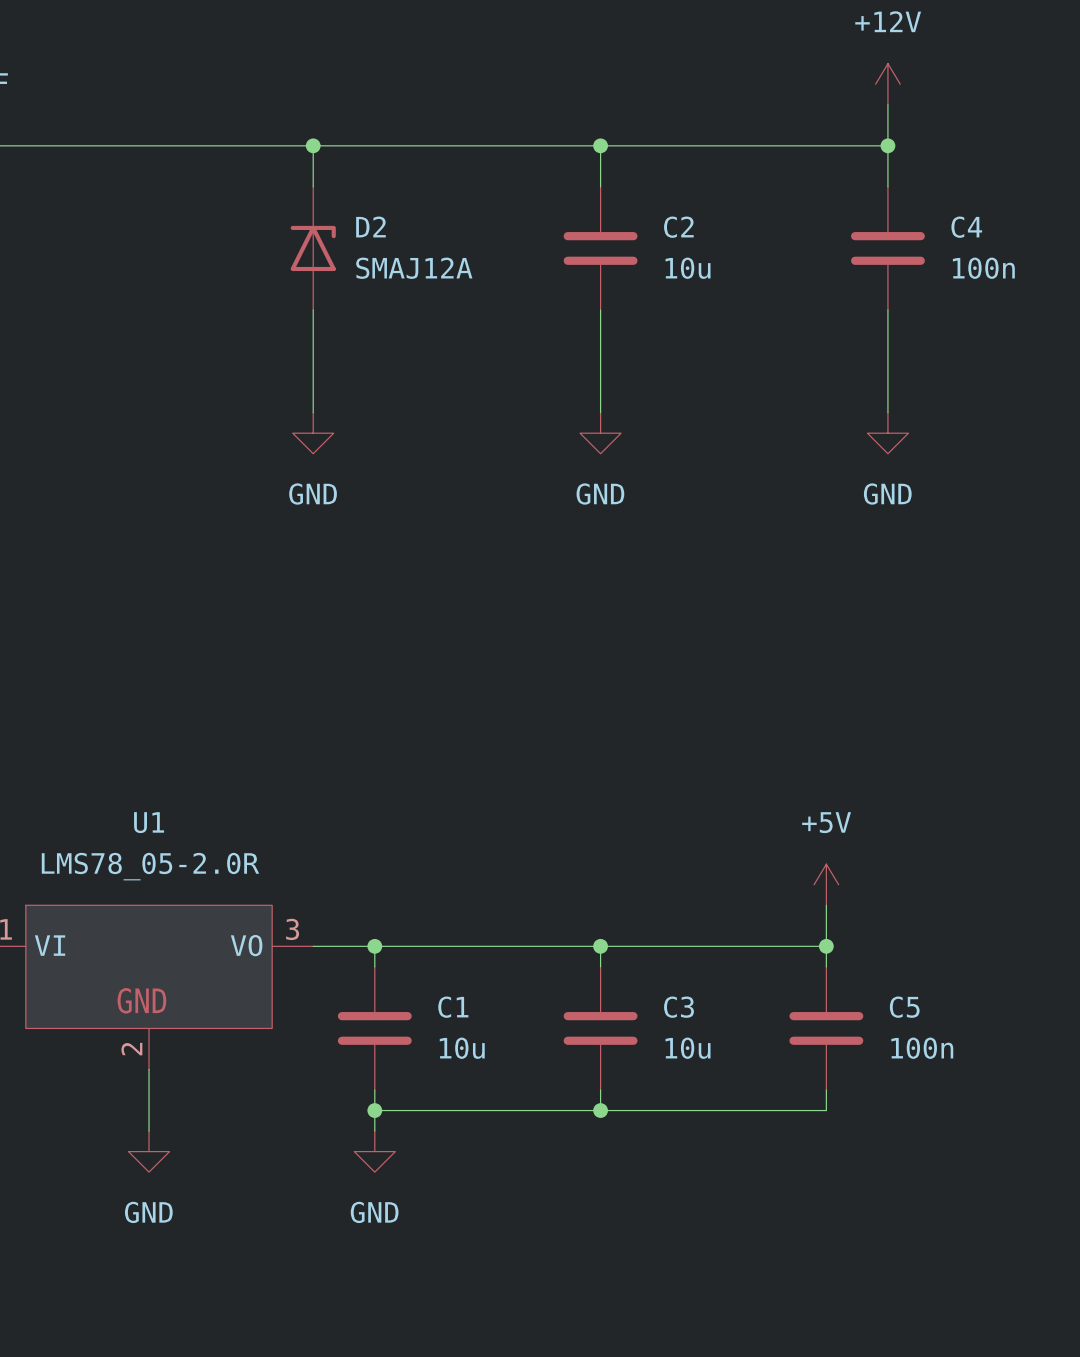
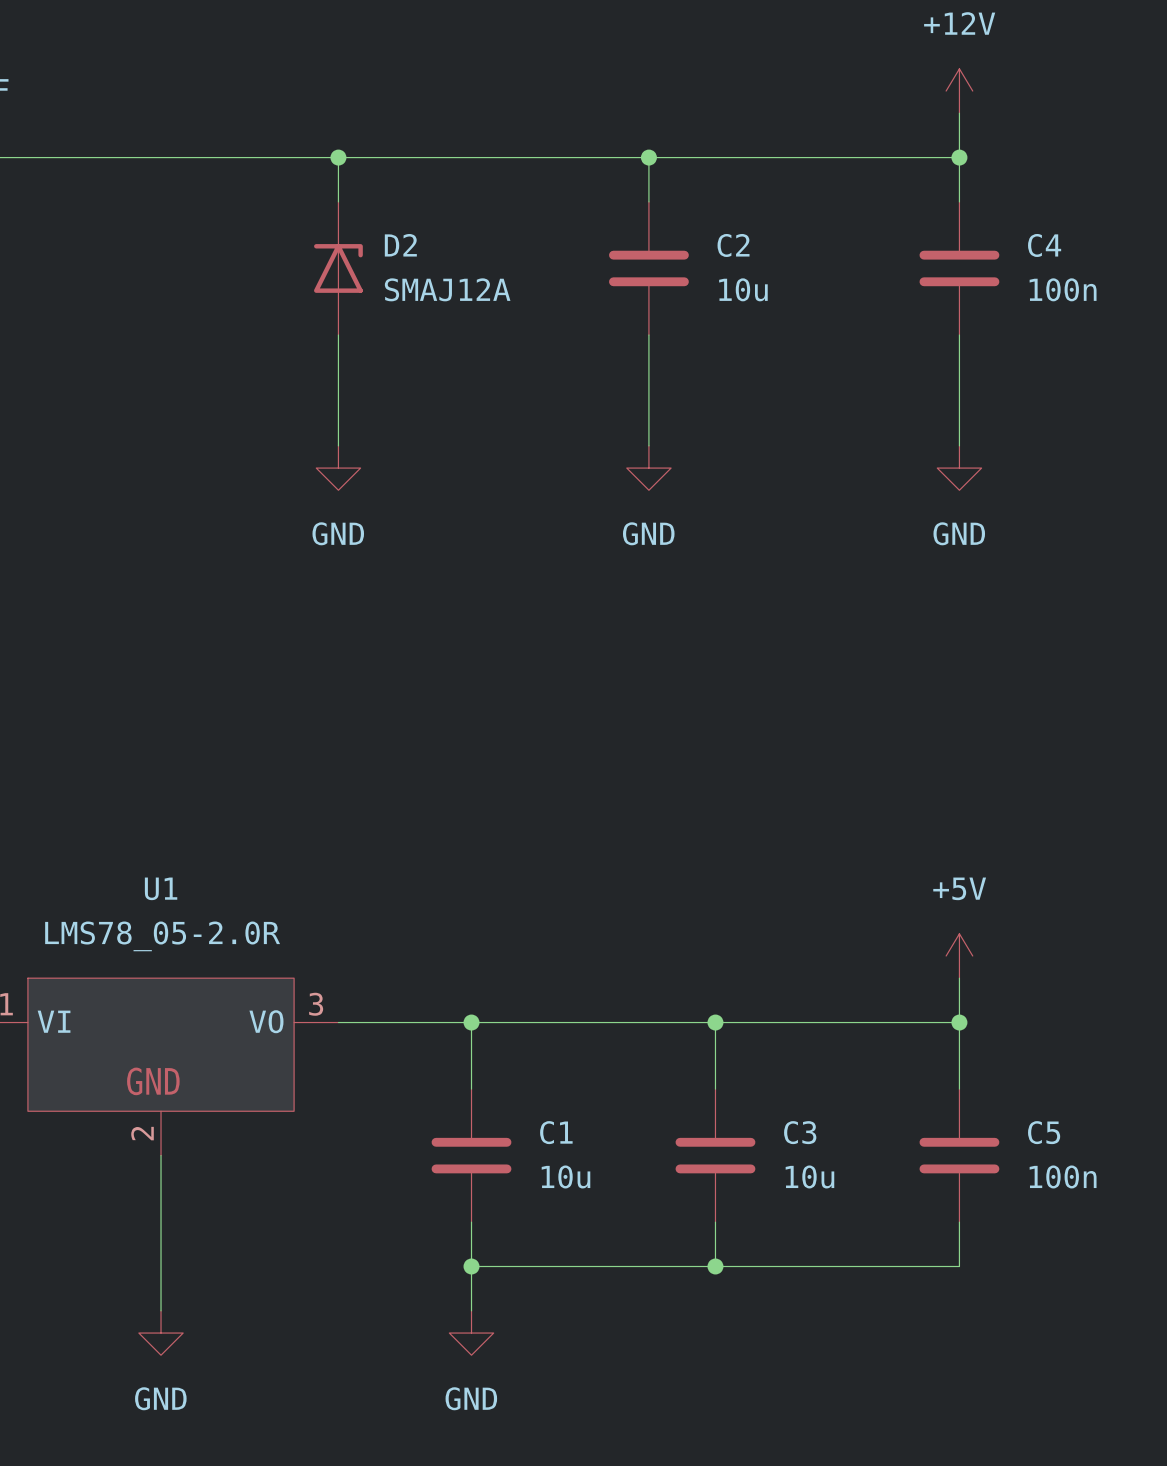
power symbol position: +5V (826, 884) -> +5V (959, 956)
wire: (826, 905) (826, 966) -> (715, 1022) (715, 1089)
wire: none -> (959, 978) (959, 1089)
wire: (374, 946) (374, 966) -> none
junction position: (374, 946) -> (471, 1022)
wire: none -> (471, 1022) (471, 1089)
wire: (600, 946) (600, 966) -> none
junction position: (600, 946) -> (715, 1022)
wire: none -> (892, 1022) (959, 1022)
junction position: (826, 946) -> (959, 1022)
C1 position: (374, 1028) -> (471, 1155)
C3 position: (600, 1028) -> (715, 1155)
C5 position: (826, 1028) -> (959, 1155)
wire: (374, 1090) (374, 1131) -> (715, 1222) (715, 1266)
wire: (600, 1090) (600, 1110) -> none
wire: (826, 1090) (826, 1110) (374, 1110) -> none
junction position: (374, 1110) -> (471, 1266)
junction position: (600, 1110) -> (715, 1266)
wire: none -> (161, 1222) (161, 1310)
wire: none -> (471, 1222) (471, 1310)
wire: none -> (959, 1222) (959, 1266) (471, 1266)
power symbol position: GND (149, 1151) -> GND (161, 1333)
power symbol position: GND (374, 1151) -> GND (471, 1333)

